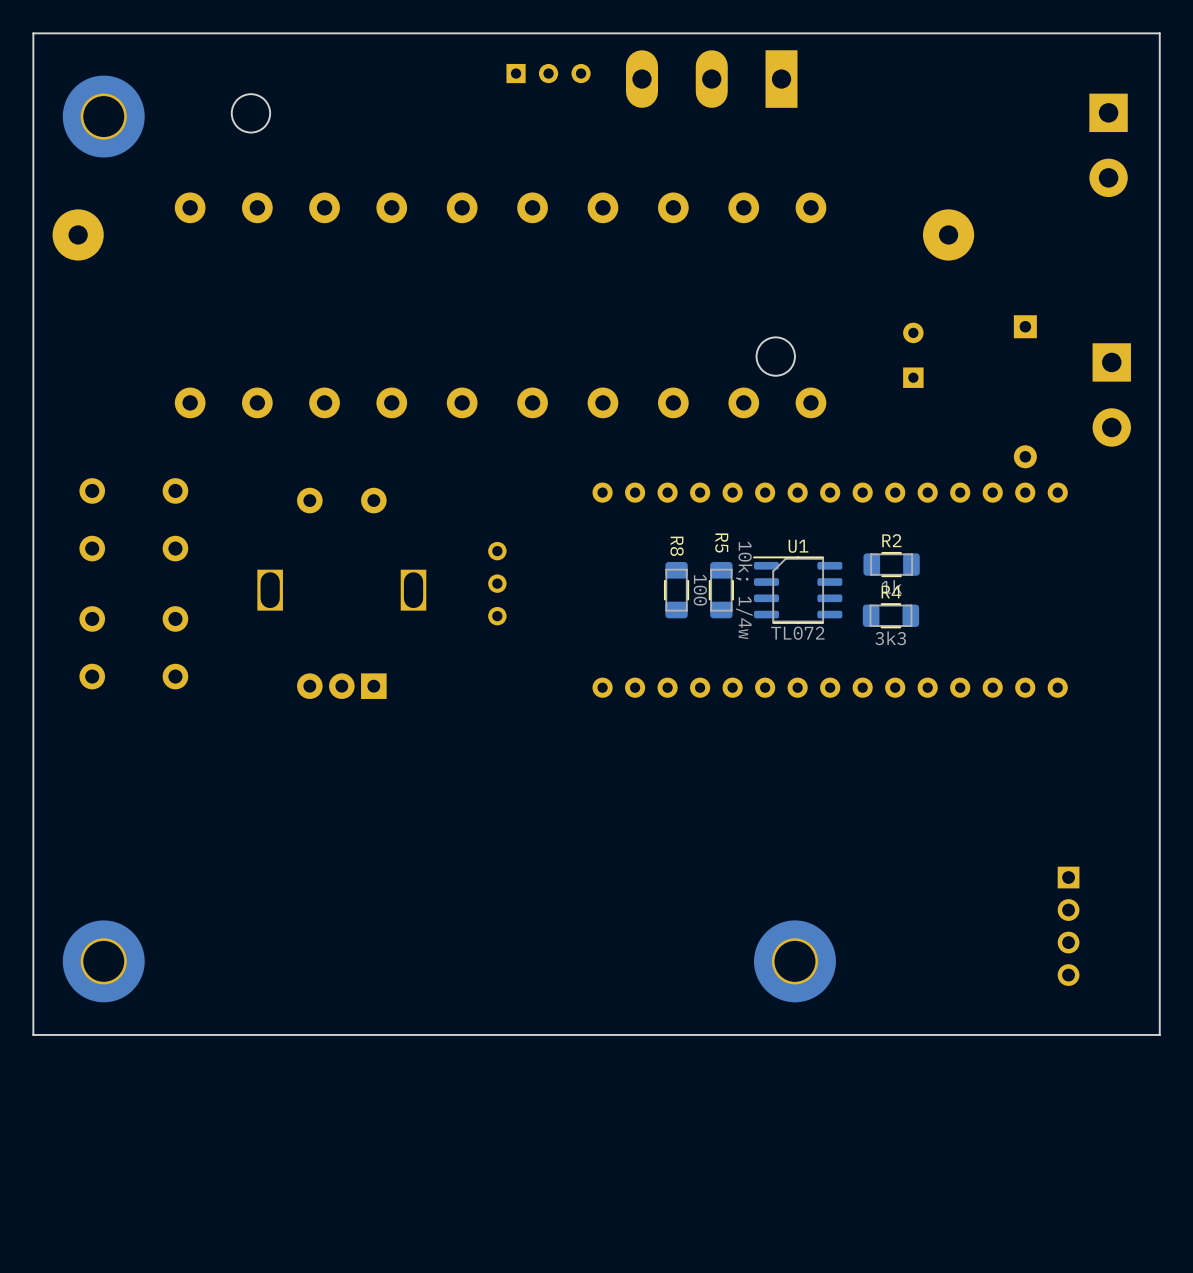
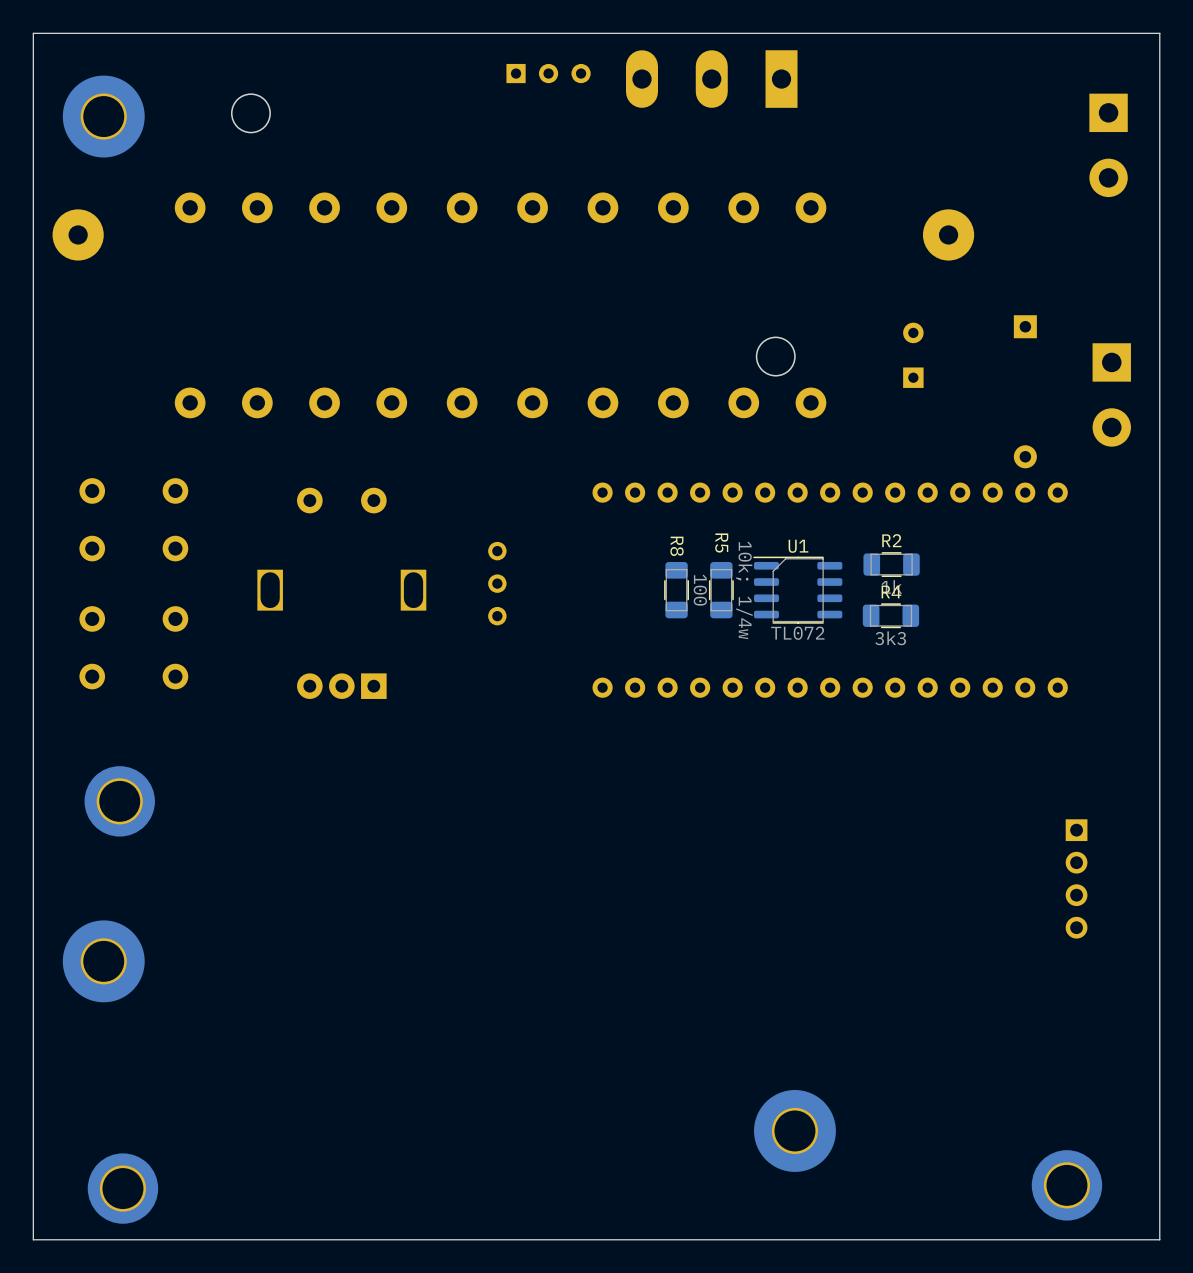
part: none -> (119, 801)
part position: (1068, 926) -> (1076, 878)
part position: (794, 961) -> (794, 1130)
board edge: (1159, 1034) (33, 1034) -> (1159, 1034) (1159, 1239) (33, 1239) (33, 1034)
part: none -> (1066, 1185)
part: none -> (122, 1188)

